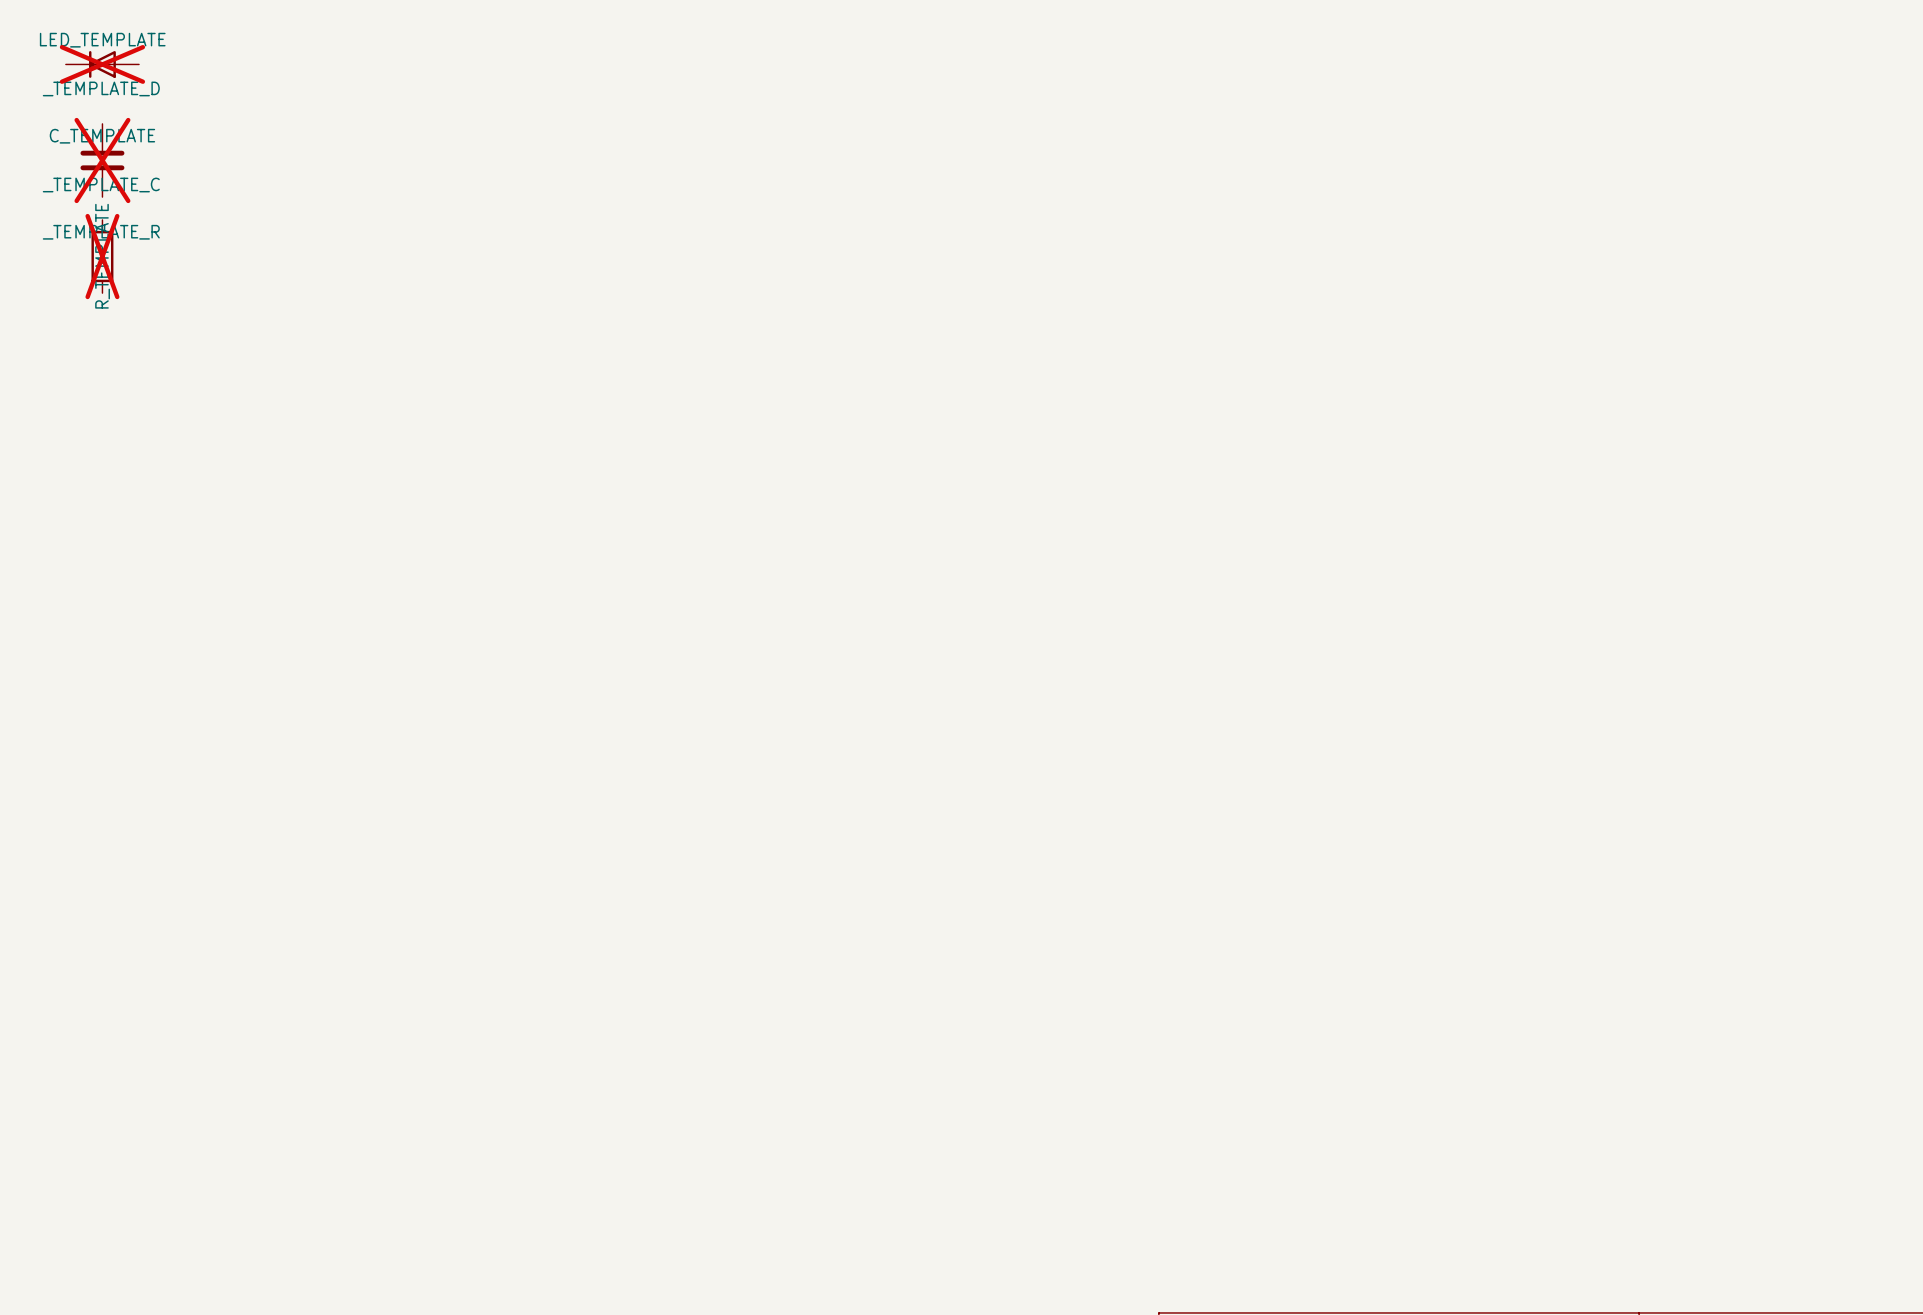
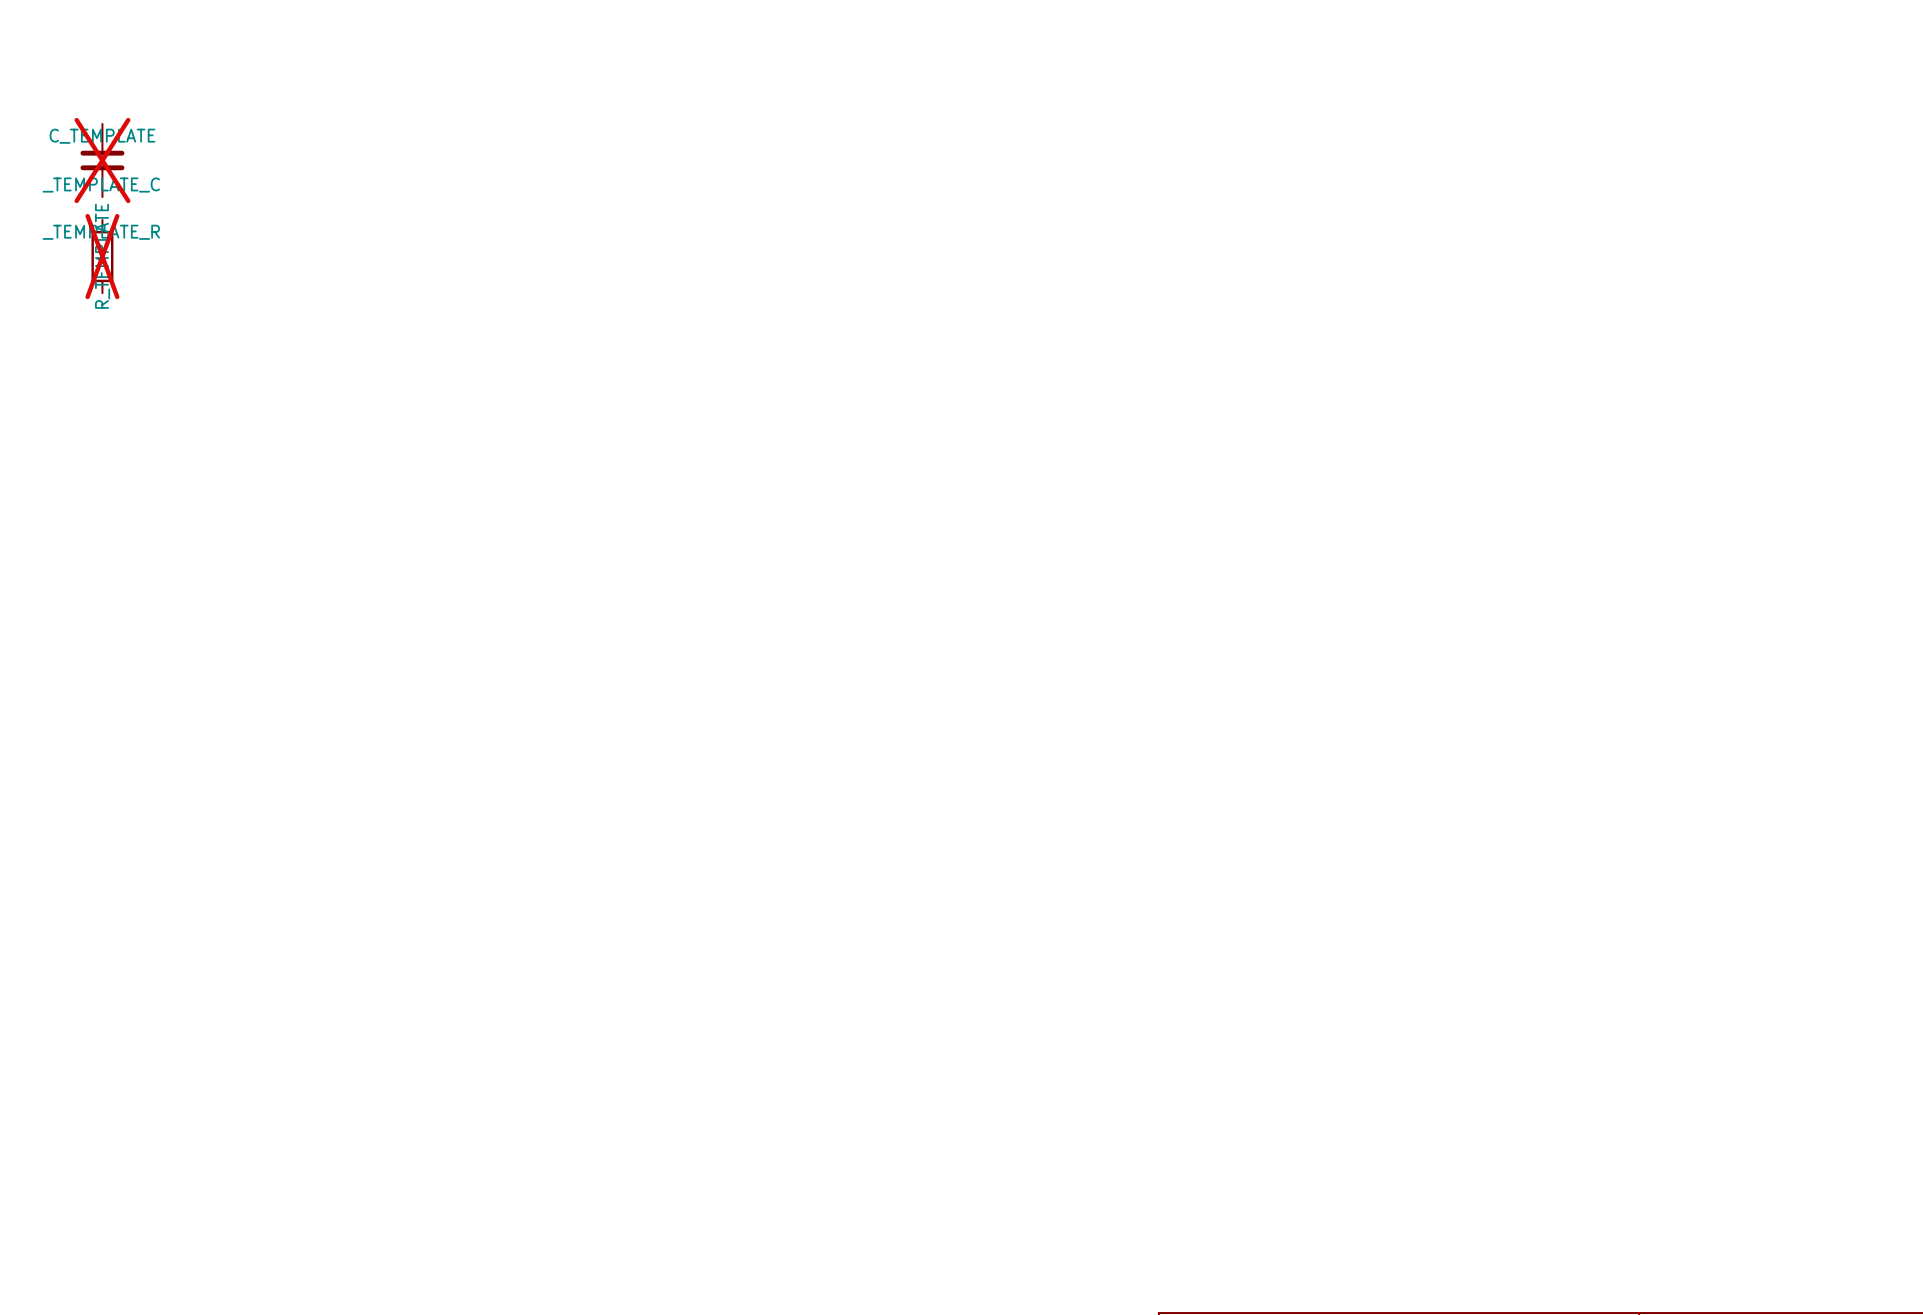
_TEMPLATE_D: LED_TEMPLATE (102, 64) -> none

